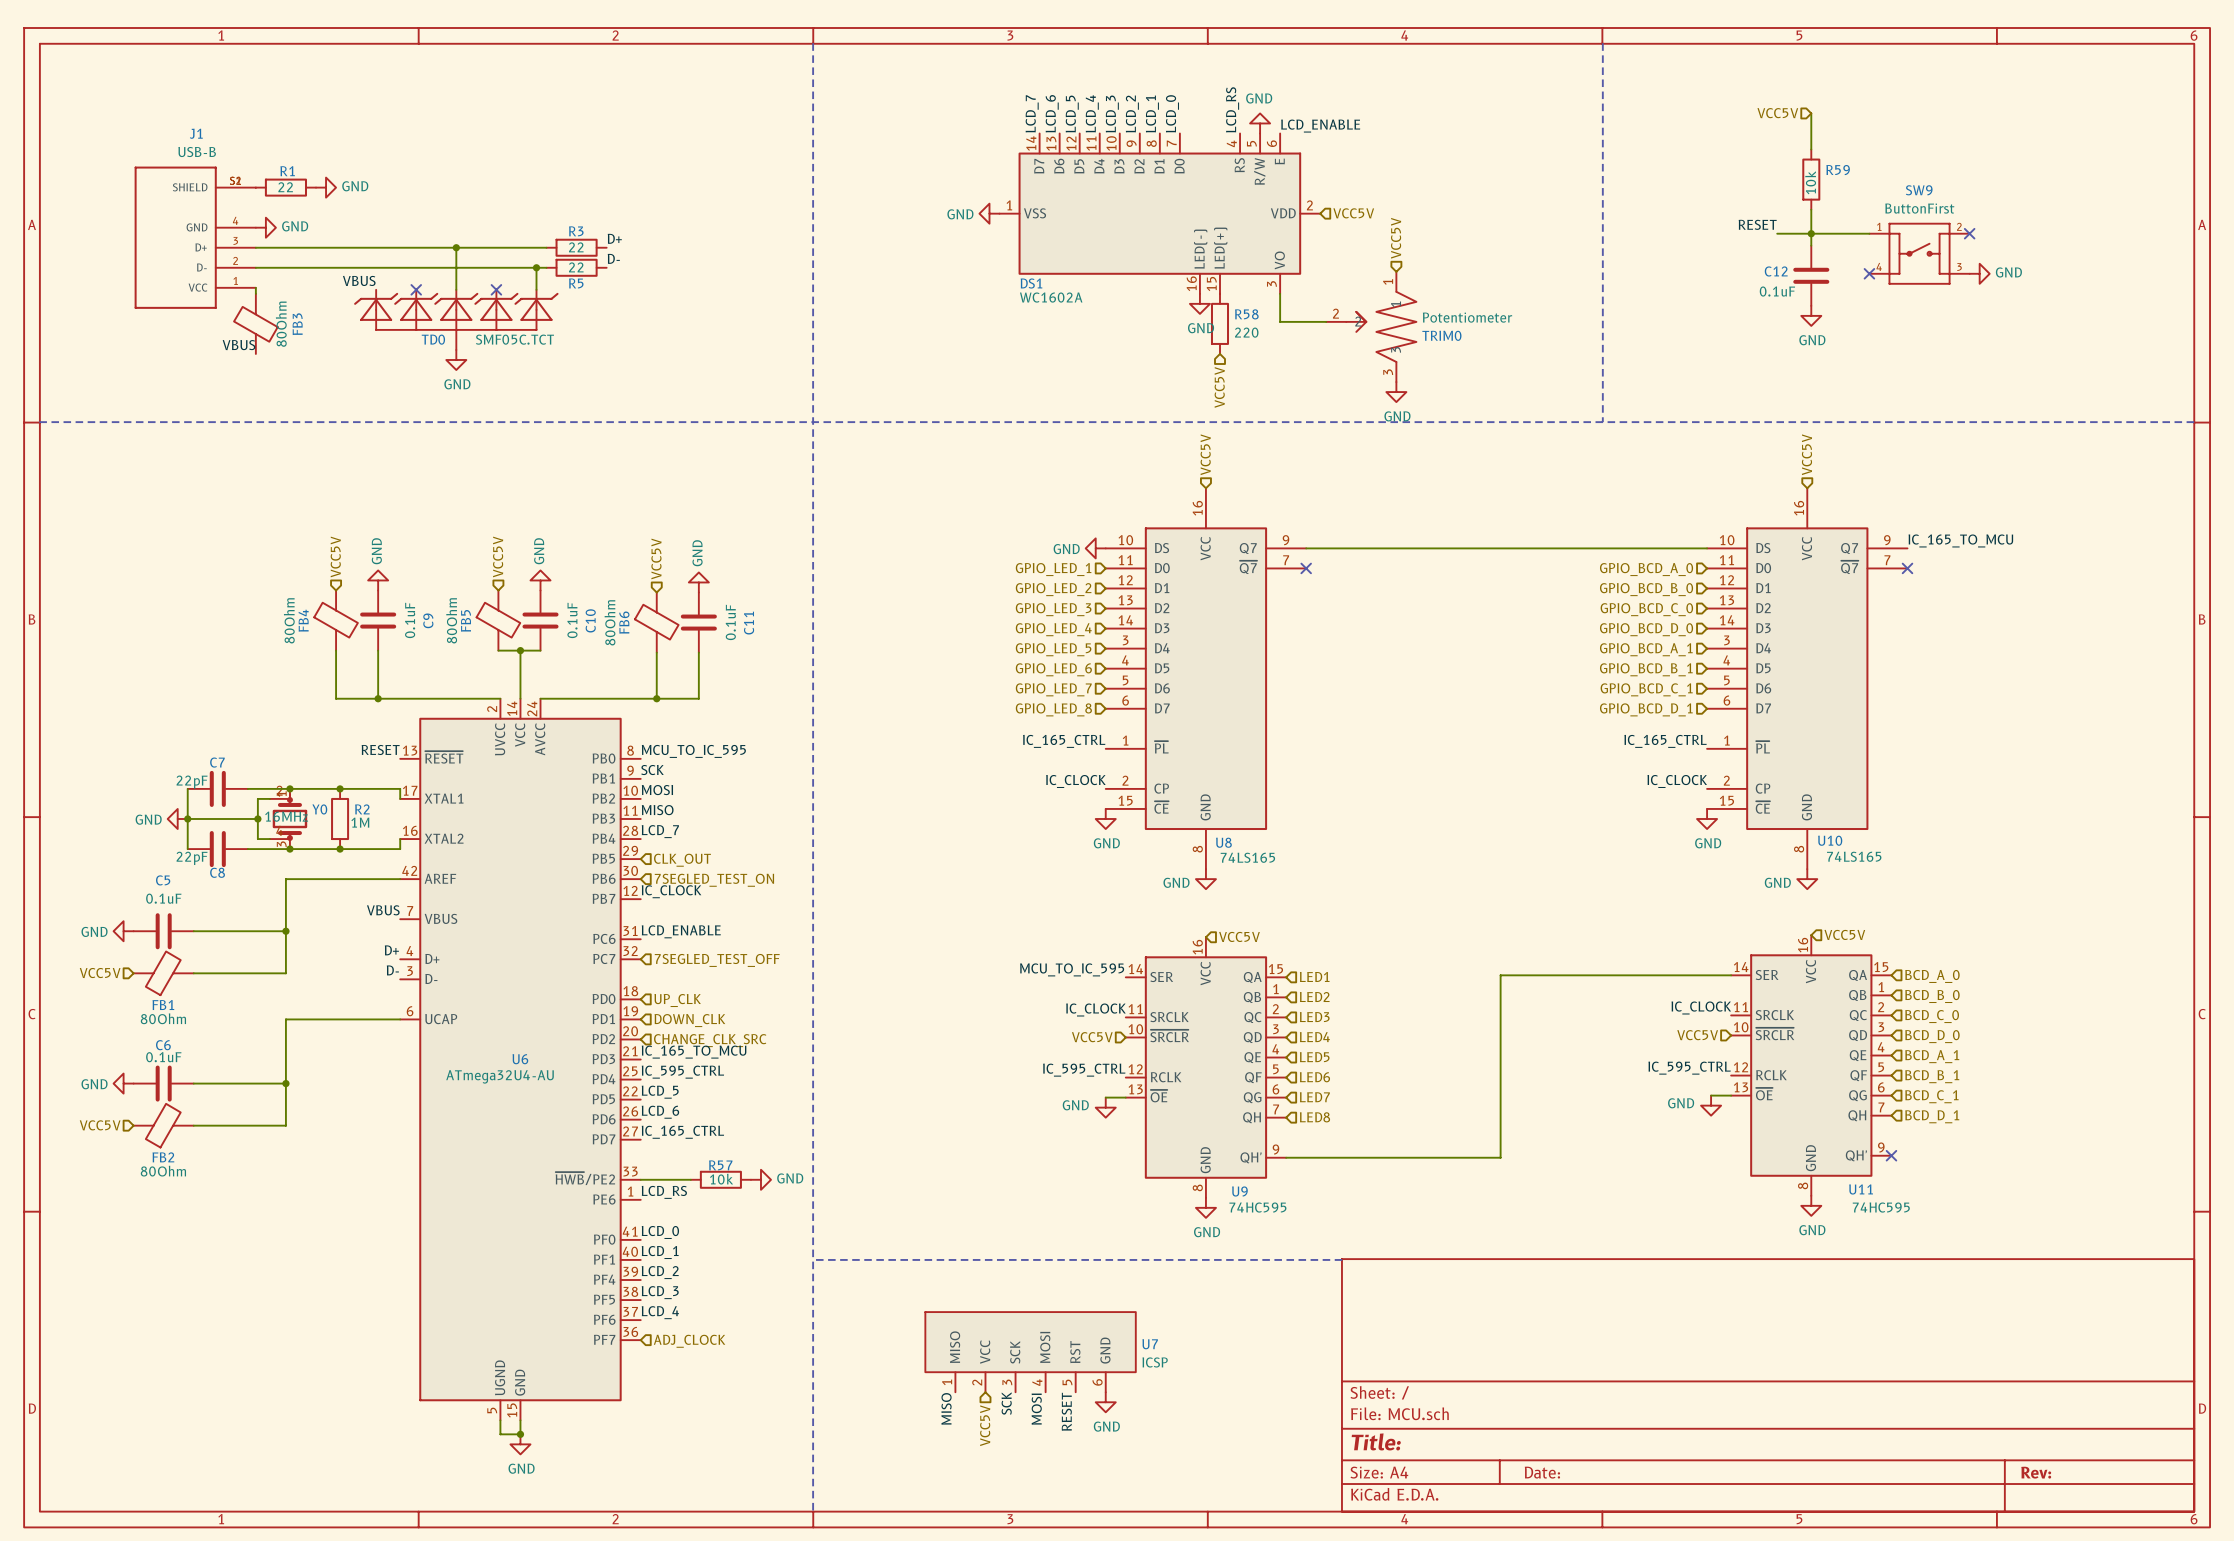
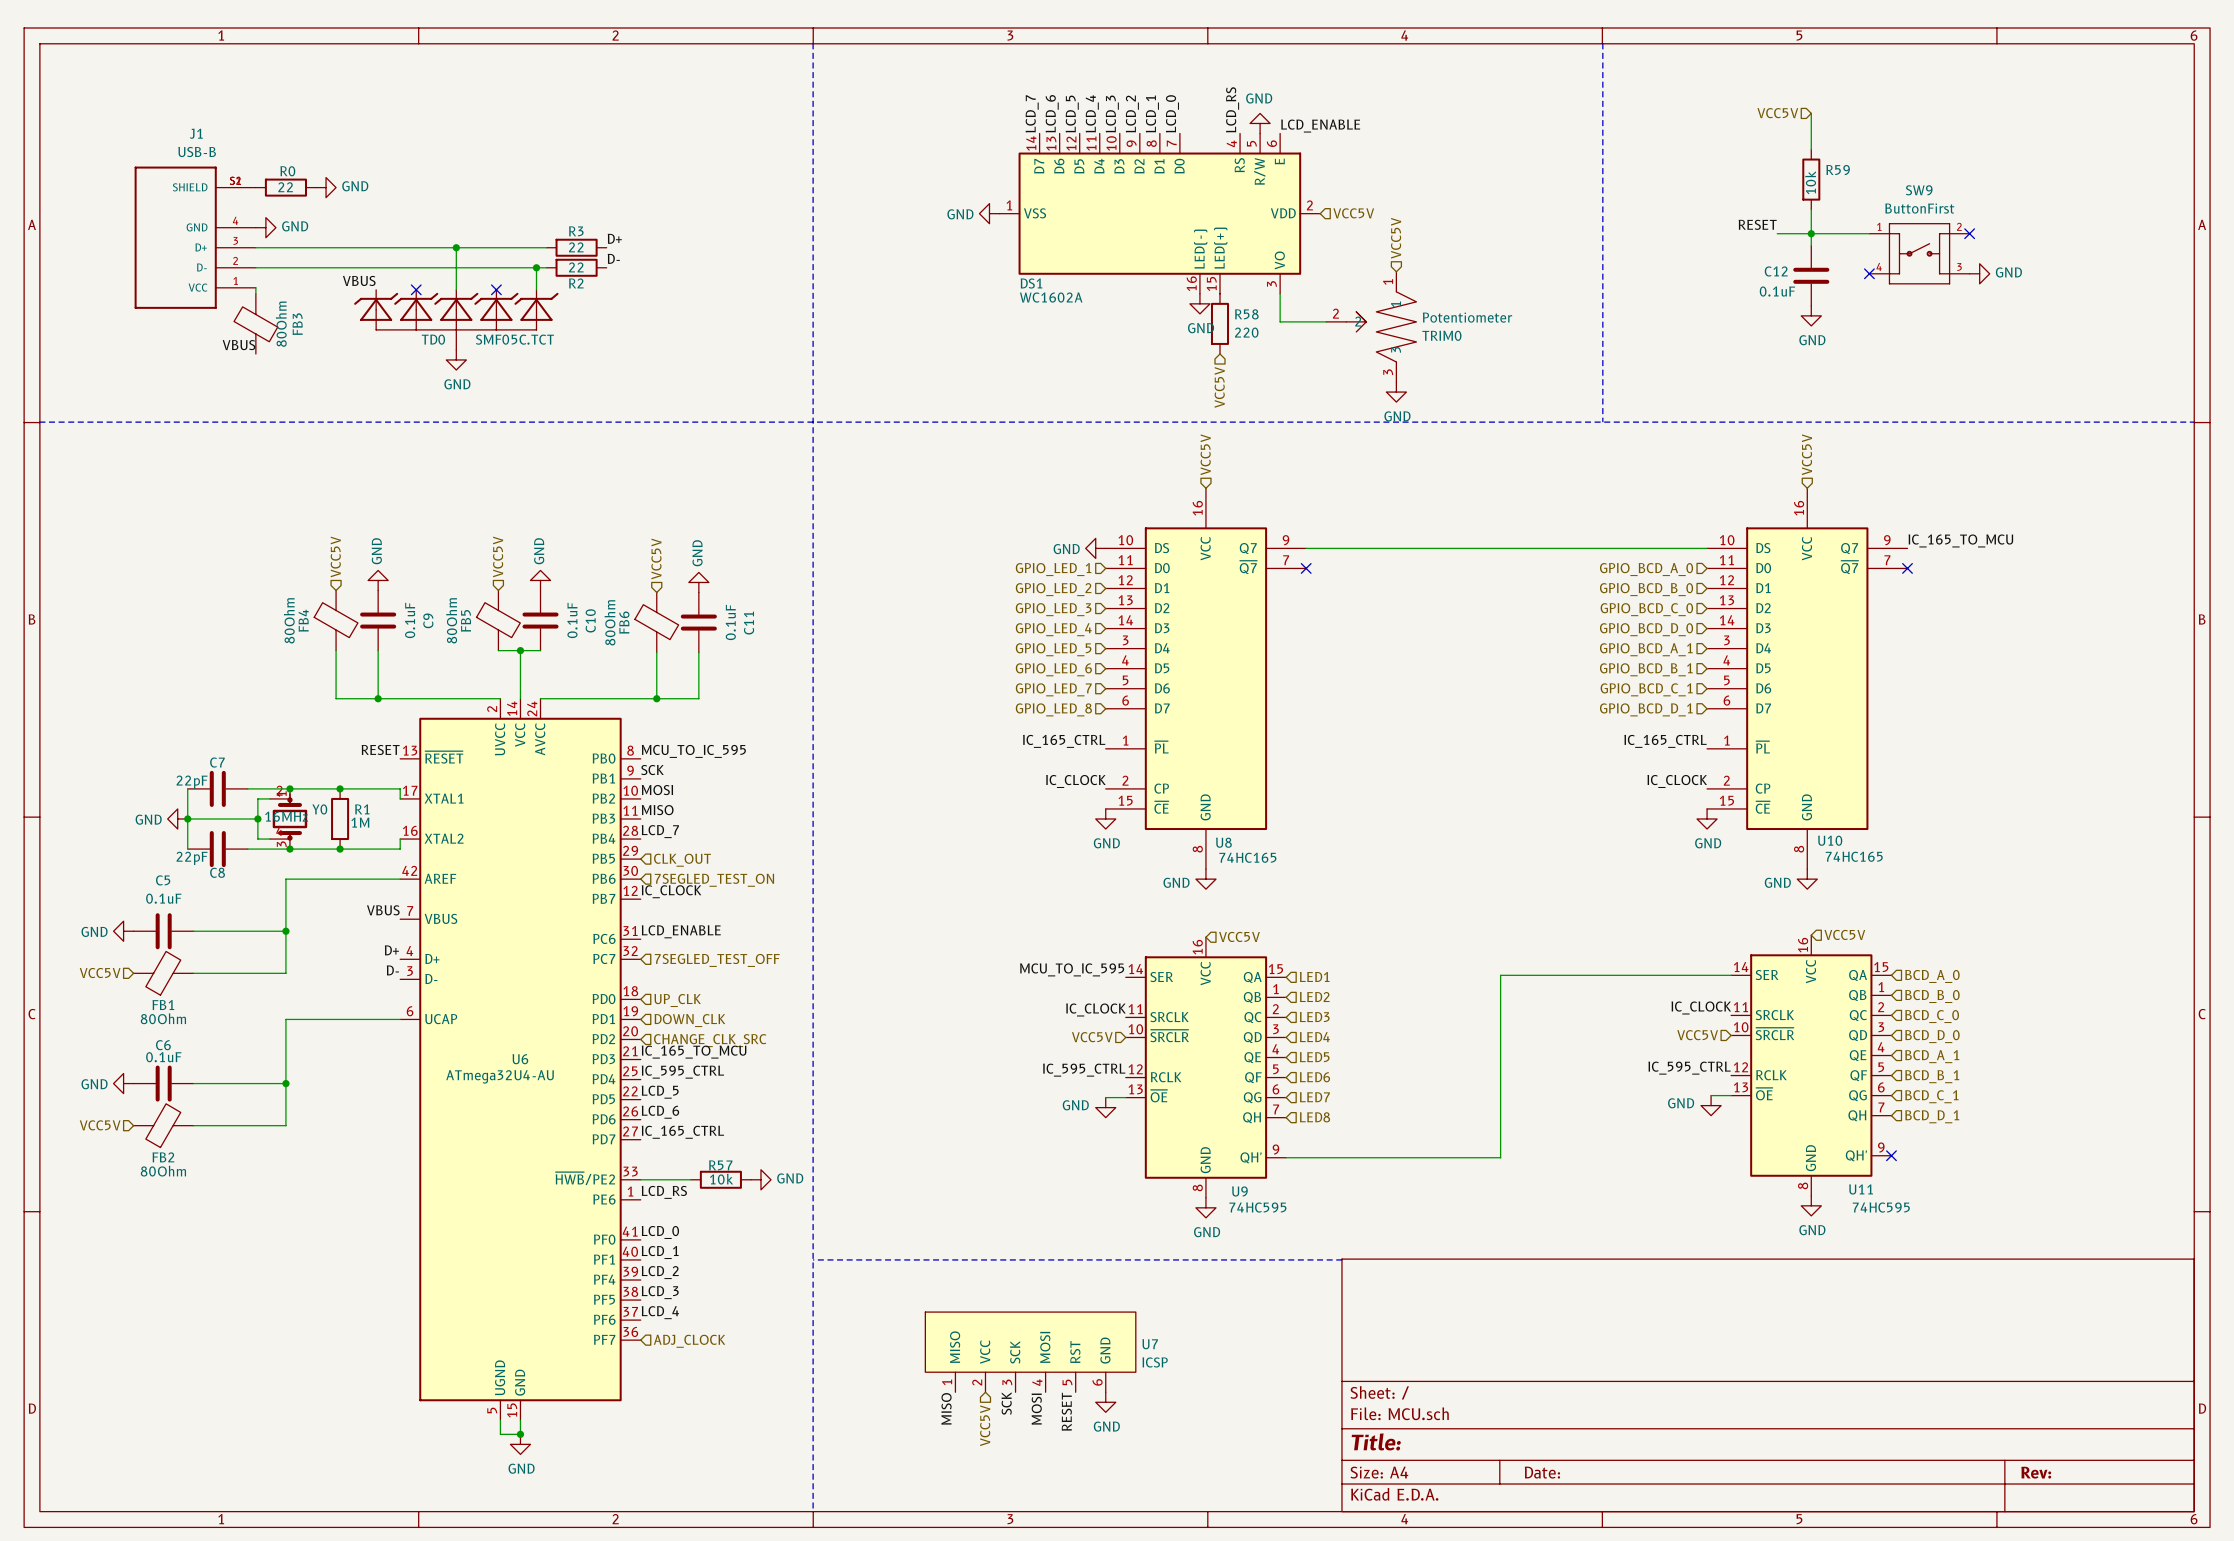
R1 name: R1 (287, 171) -> R0 (287, 171)
R5 name: R5 (576, 283) -> R2 (576, 283)
R2 name: R2 (362, 809) -> R1 (362, 809)
U10 value: 74LS165 (1854, 856) -> 74HC165 (1854, 856)
U8 value: 74LS165 (1247, 857) -> 74HC165 (1247, 857)

